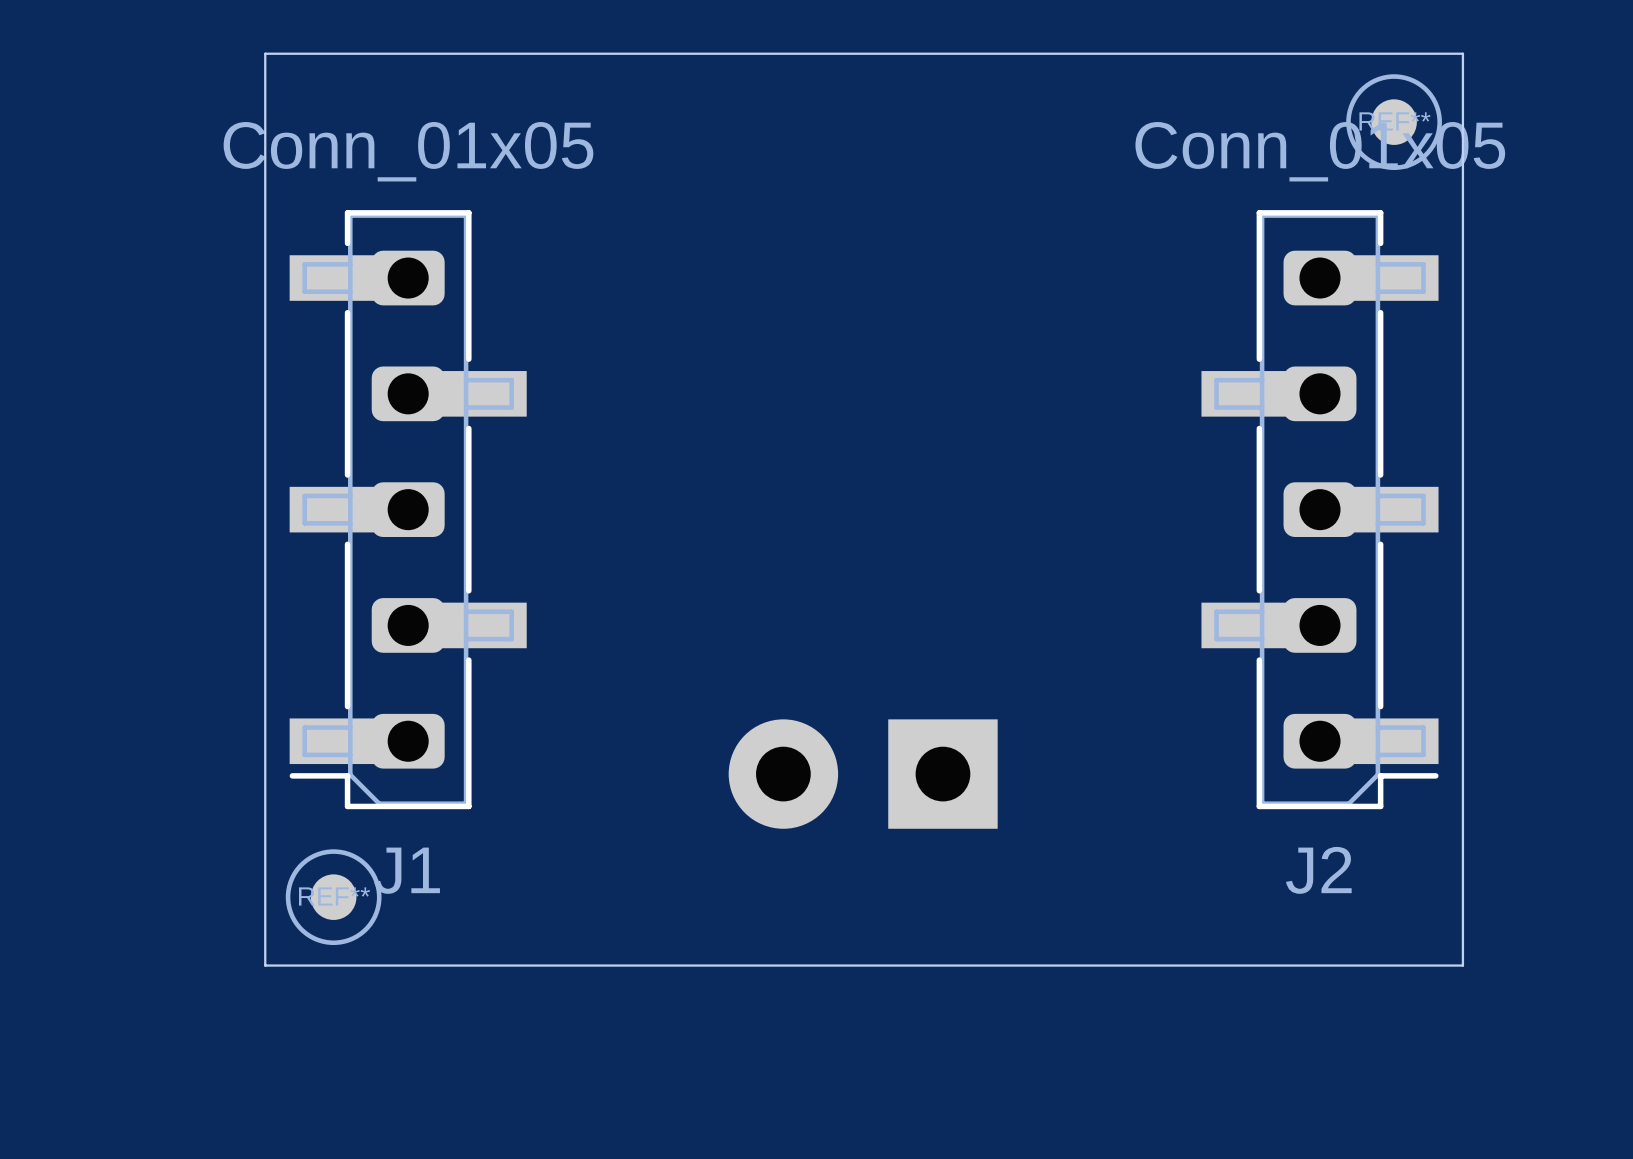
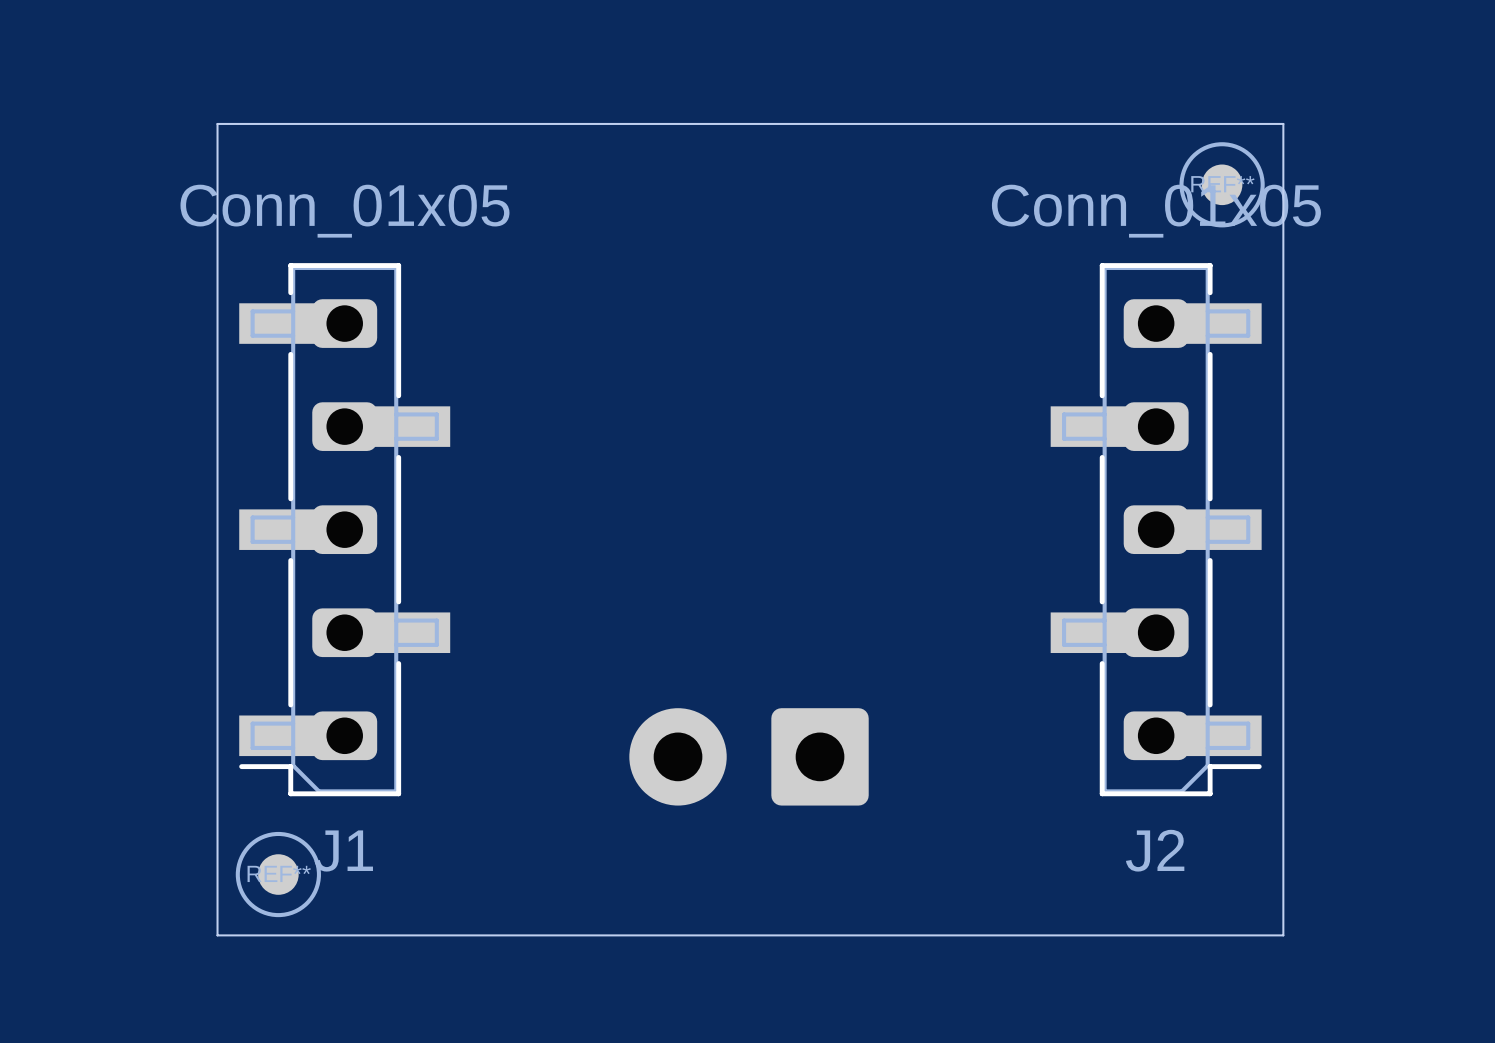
part footprint: [728, 719, 998, 829] -> [629, 708, 869, 806]

